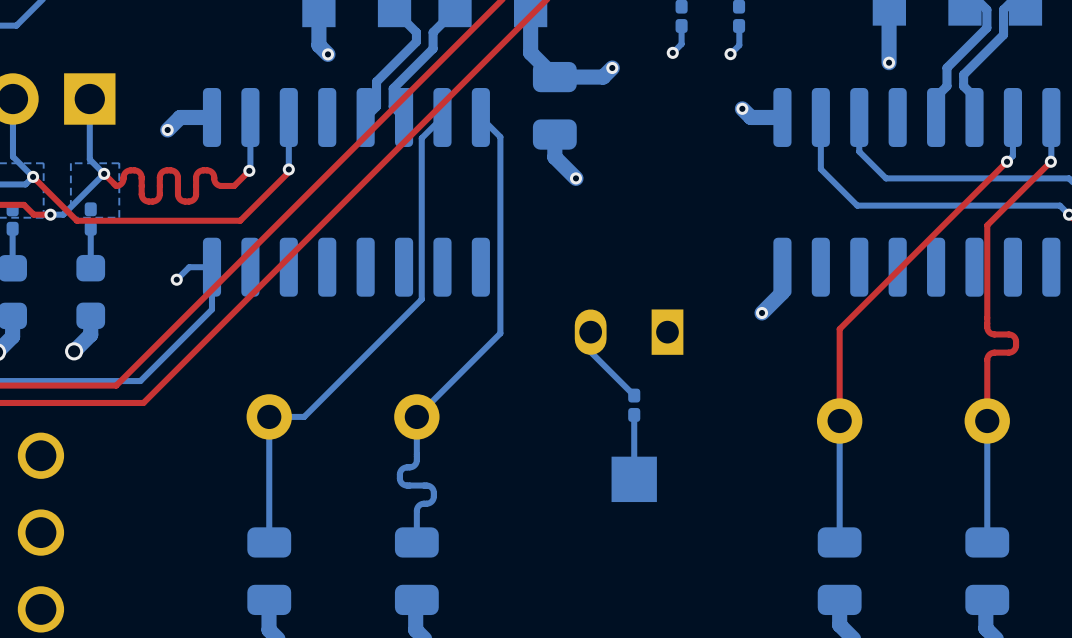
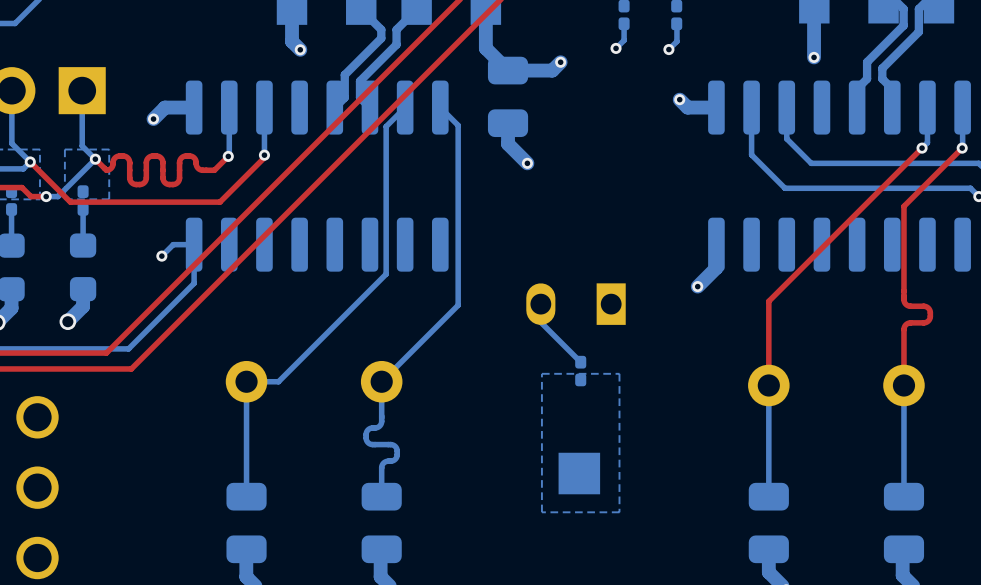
bottom zone outline: none -> (541, 373) (541, 512) (619, 512) (619, 373) (541, 373)
bottom track: (634, 414) (634, 479) -> none
part position: (634, 479) -> (579, 473)

